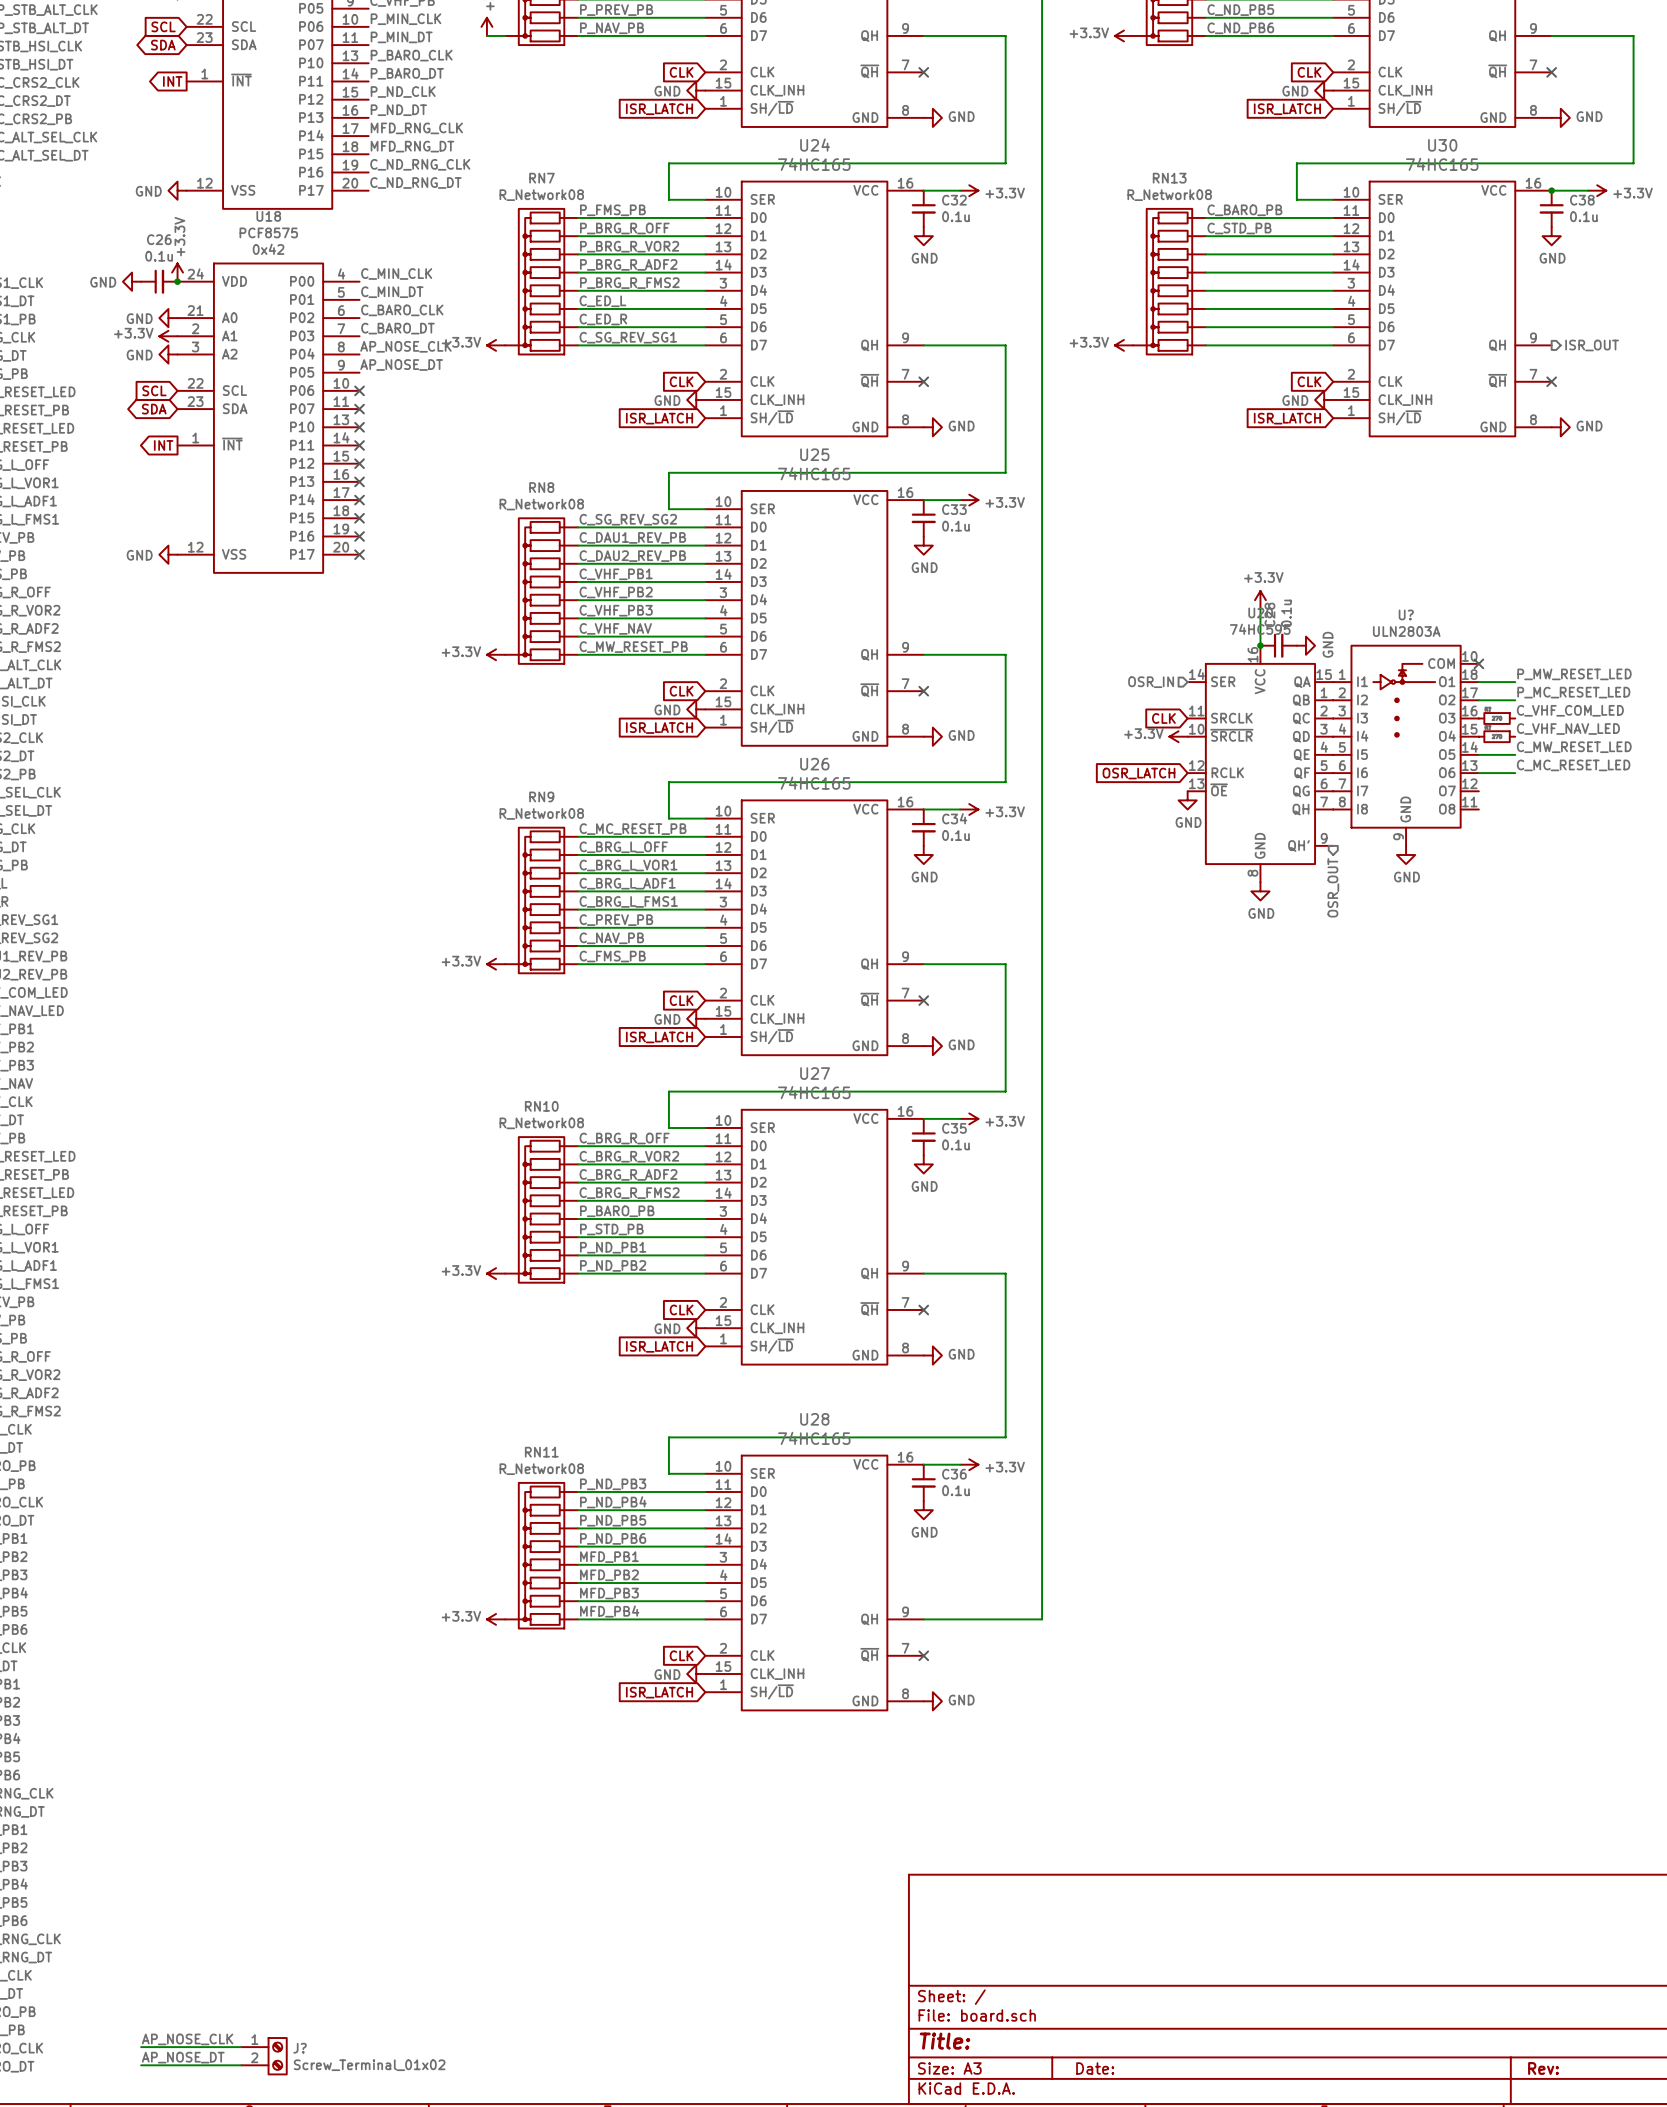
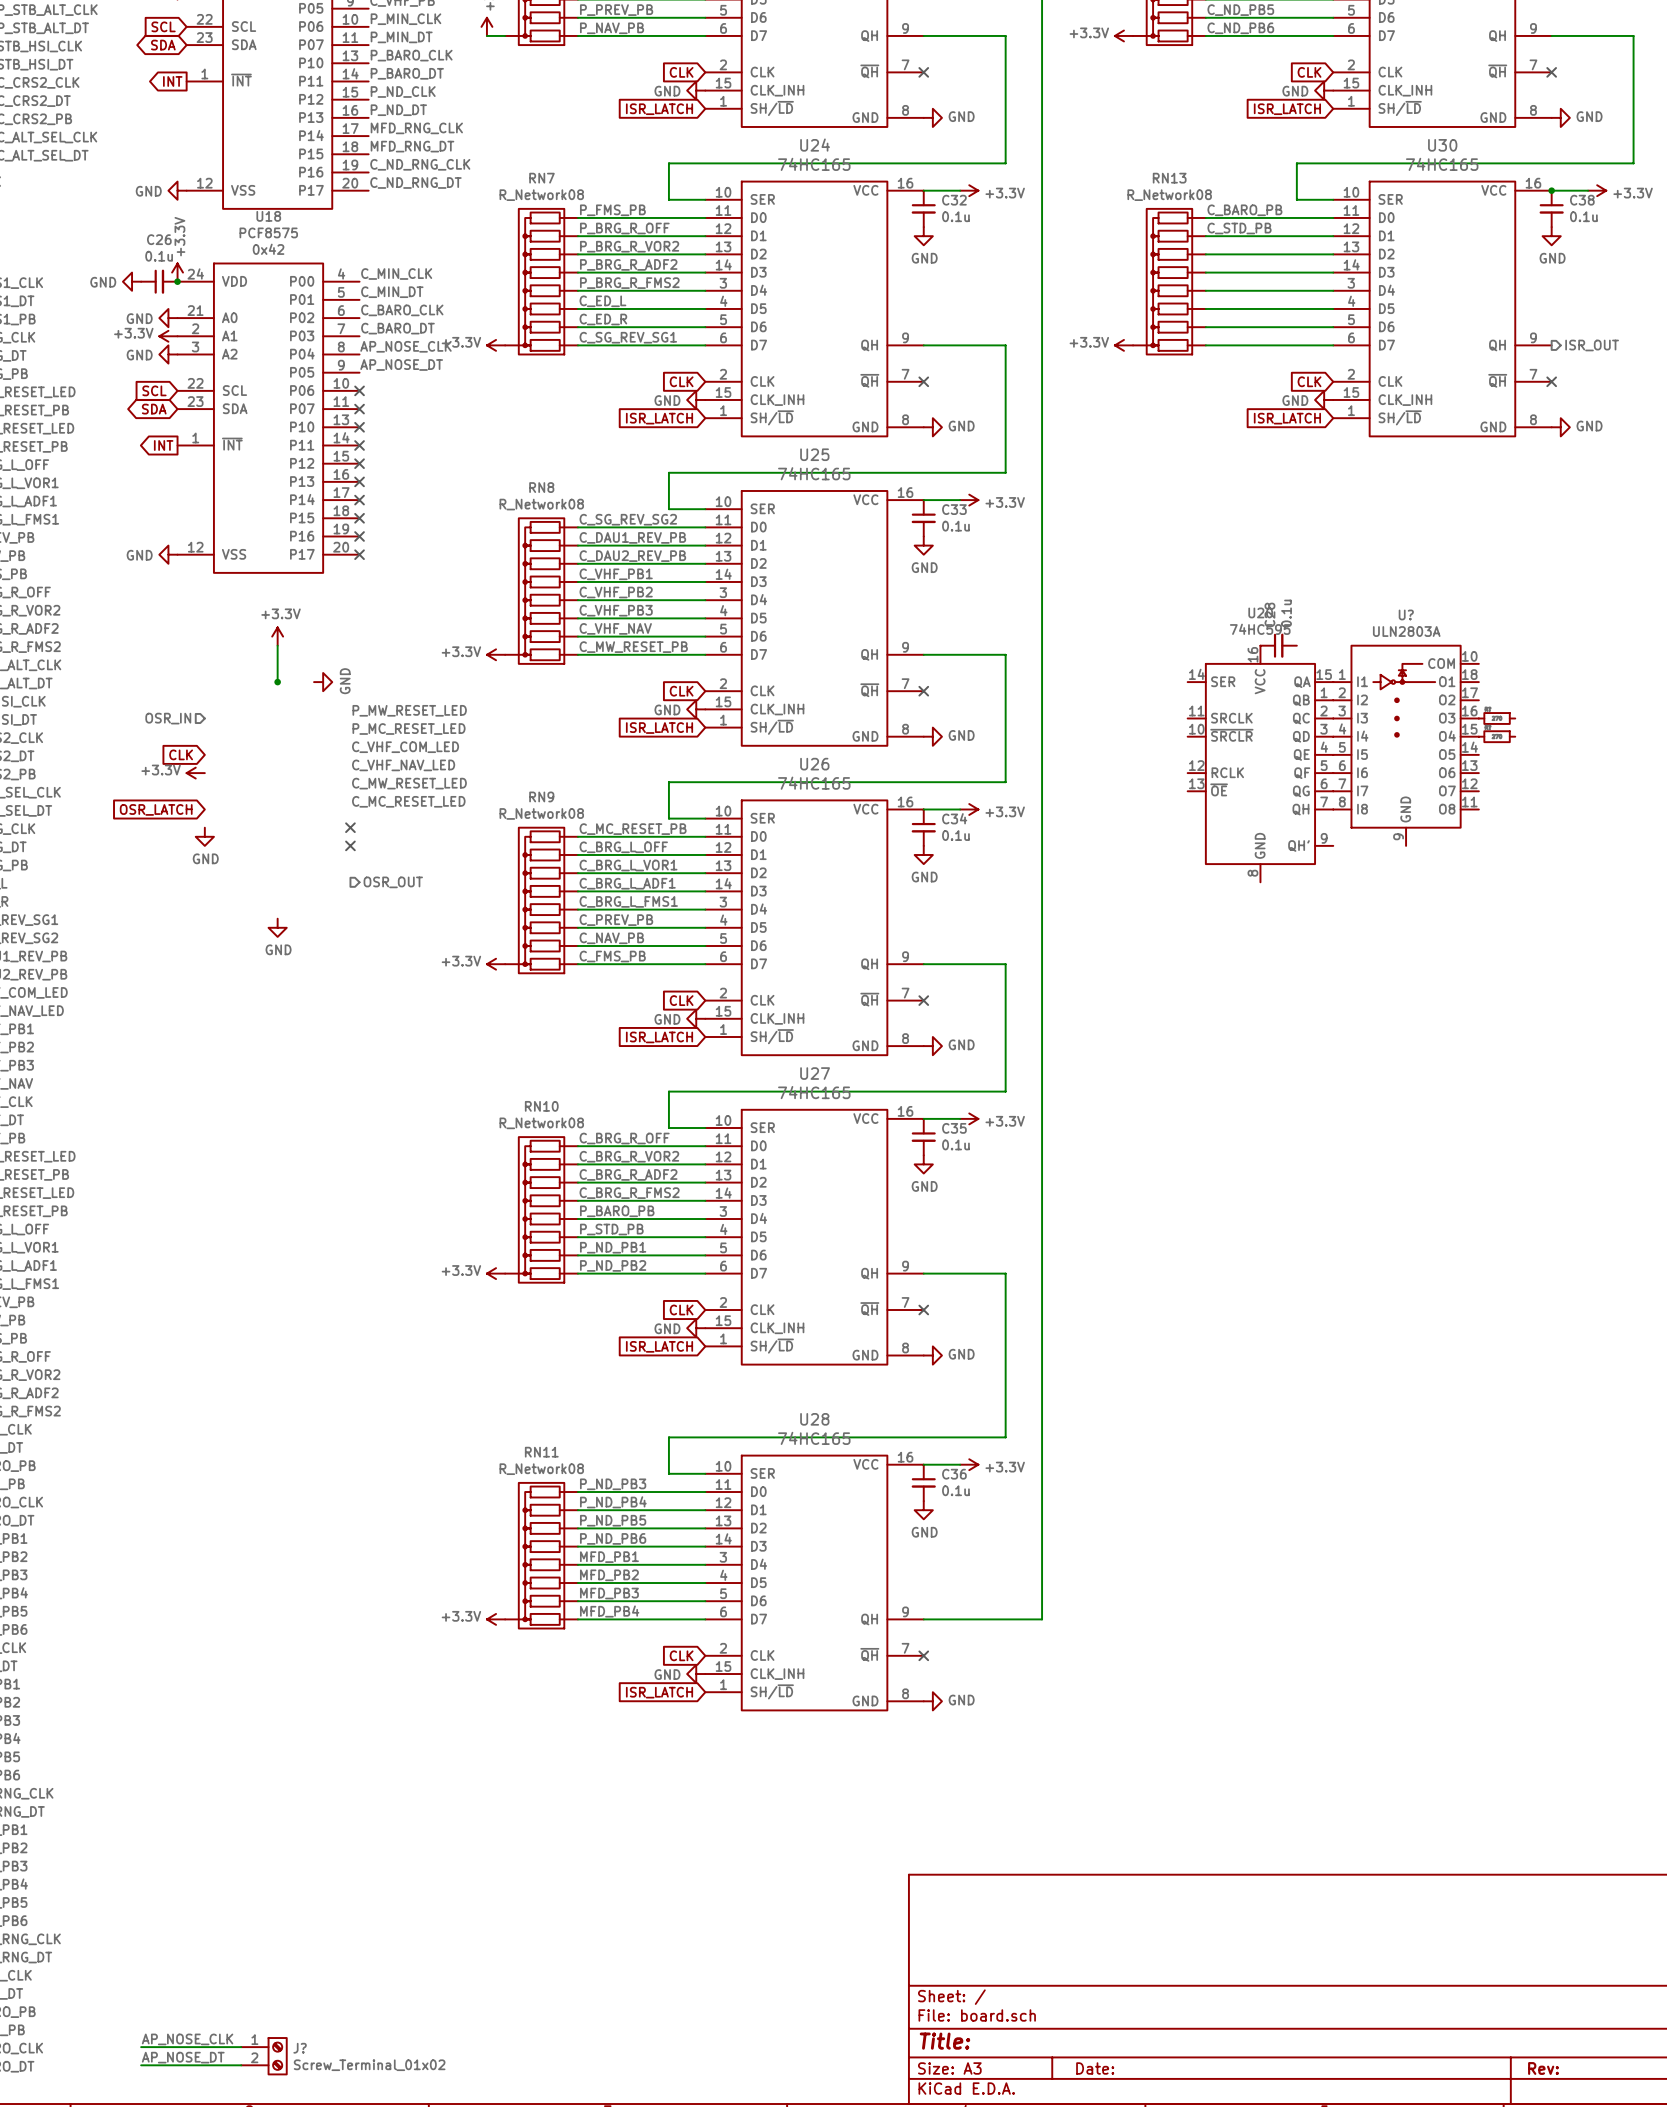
power symbol: +3.3V (1260, 600) -> none
wire: (1260, 609) (1260, 645) -> none
power symbol: none -> +3.3V (277, 636)
wire: none -> (277, 645) (277, 682)
junction: (1260, 645) -> none
power symbol: GND (1305, 645) -> none
no-connect mark: (1478, 663) -> none
label: P_MW_RESET_LED (1574, 674) -> none
junction: none -> (277, 682)
power symbol: none -> GND (323, 682)
hierarchical label: OSR_IN (1151, 682) -> none
wire: (1478, 682) (1515, 682) -> none
label: P_MC_RESET_LED (1573, 692) -> none
wire: (1478, 700) (1515, 700) -> none
label: none -> P_MW_RESET_LED (409, 710)
label: C_VHF_COM_LED (1570, 710) -> none
hierarchical label: none -> OSR_IN (168, 718)
global label: CLK (1163, 718) -> none
label: none -> P_MC_RESET_LED (409, 729)
label: C_VHF_NAV_LED (1568, 729) -> none
power symbol: +3.3V (1178, 736) -> none
label: none -> C_VHF_COM_LED (405, 747)
label: C_MW_RESET_LED (1574, 747) -> none
global label: none -> CLK (181, 754)
wire: (1478, 754) (1515, 754) -> none
label: none -> C_VHF_NAV_LED (403, 765)
label: C_MC_RESET_LED (1573, 765) -> none
power symbol: none -> +3.3V (195, 773)
global label: OSR_LATCH (1139, 773) -> none
wire: (1478, 773) (1515, 773) -> none
label: none -> C_MW_RESET_LED (409, 783)
power symbol: GND (1187, 800) -> none
label: none -> C_MC_RESET_LED (408, 801)
global label: none -> OSR_LATCH (156, 809)
no-connect mark: none -> (350, 827)
power symbol: none -> GND (204, 836)
no-connect mark: none -> (350, 845)
power symbol: GND (1406, 854) -> none
hierarchical label: none -> OSR_OUT (393, 882)
hierarchical label: OSR_OUT (1333, 887) -> none
power symbol: GND (1260, 891) -> none
power symbol: none -> GND (277, 927)

